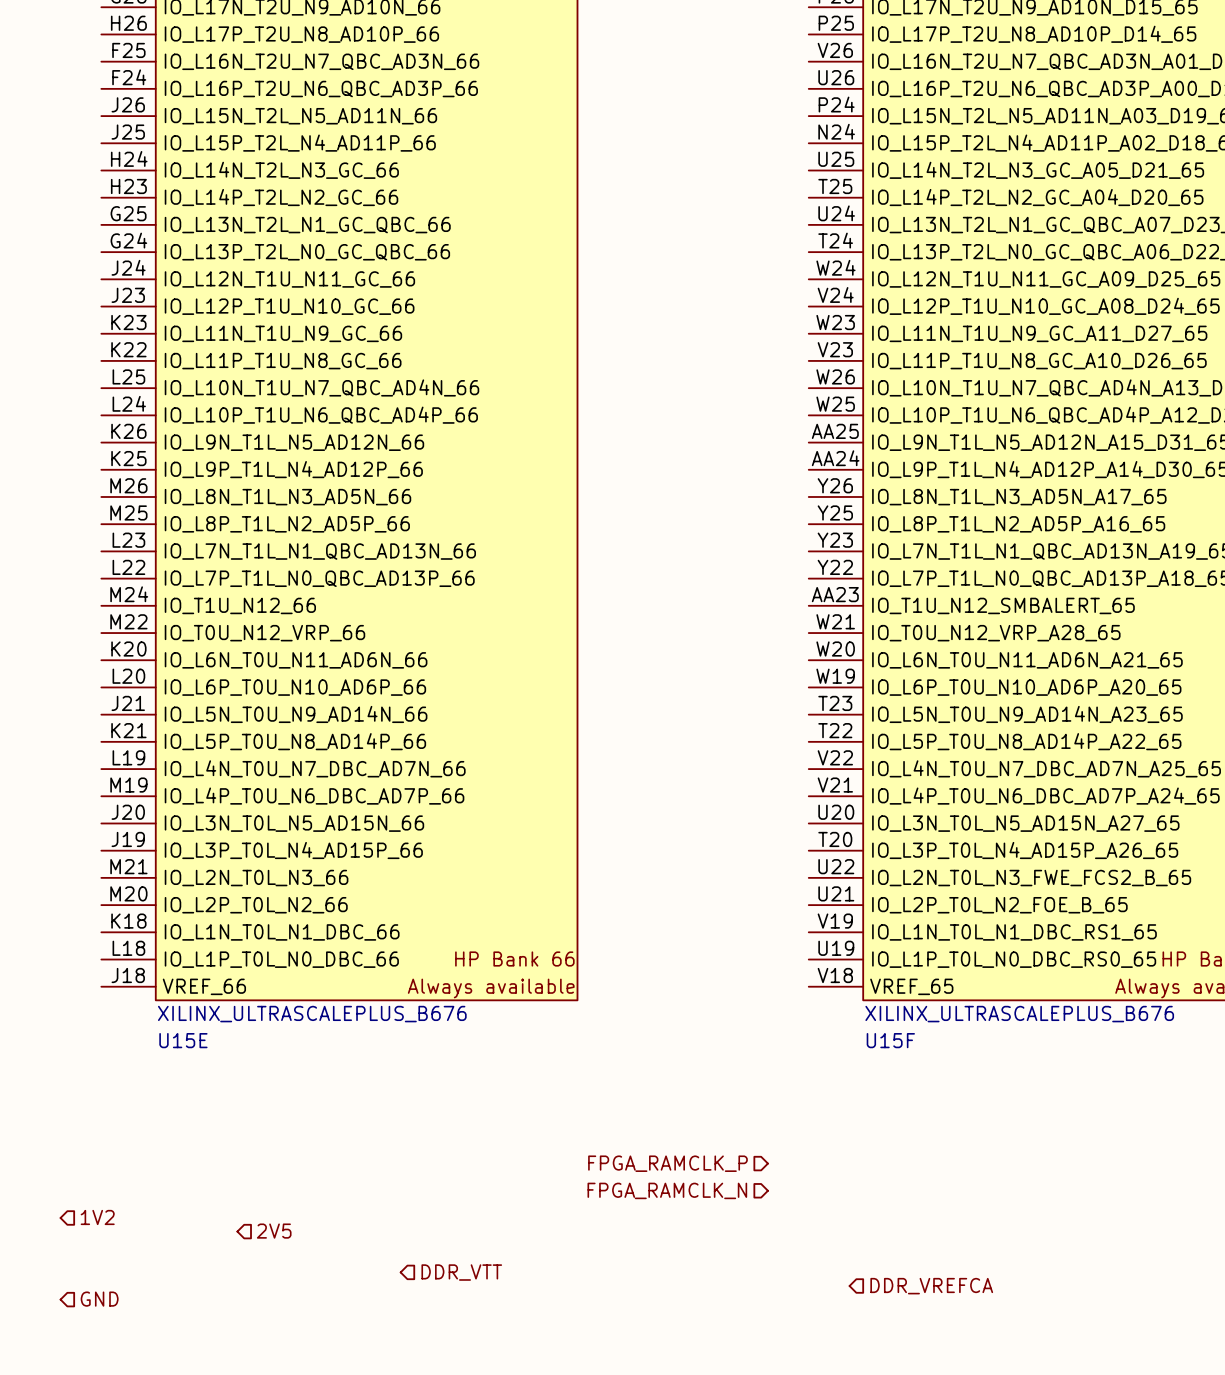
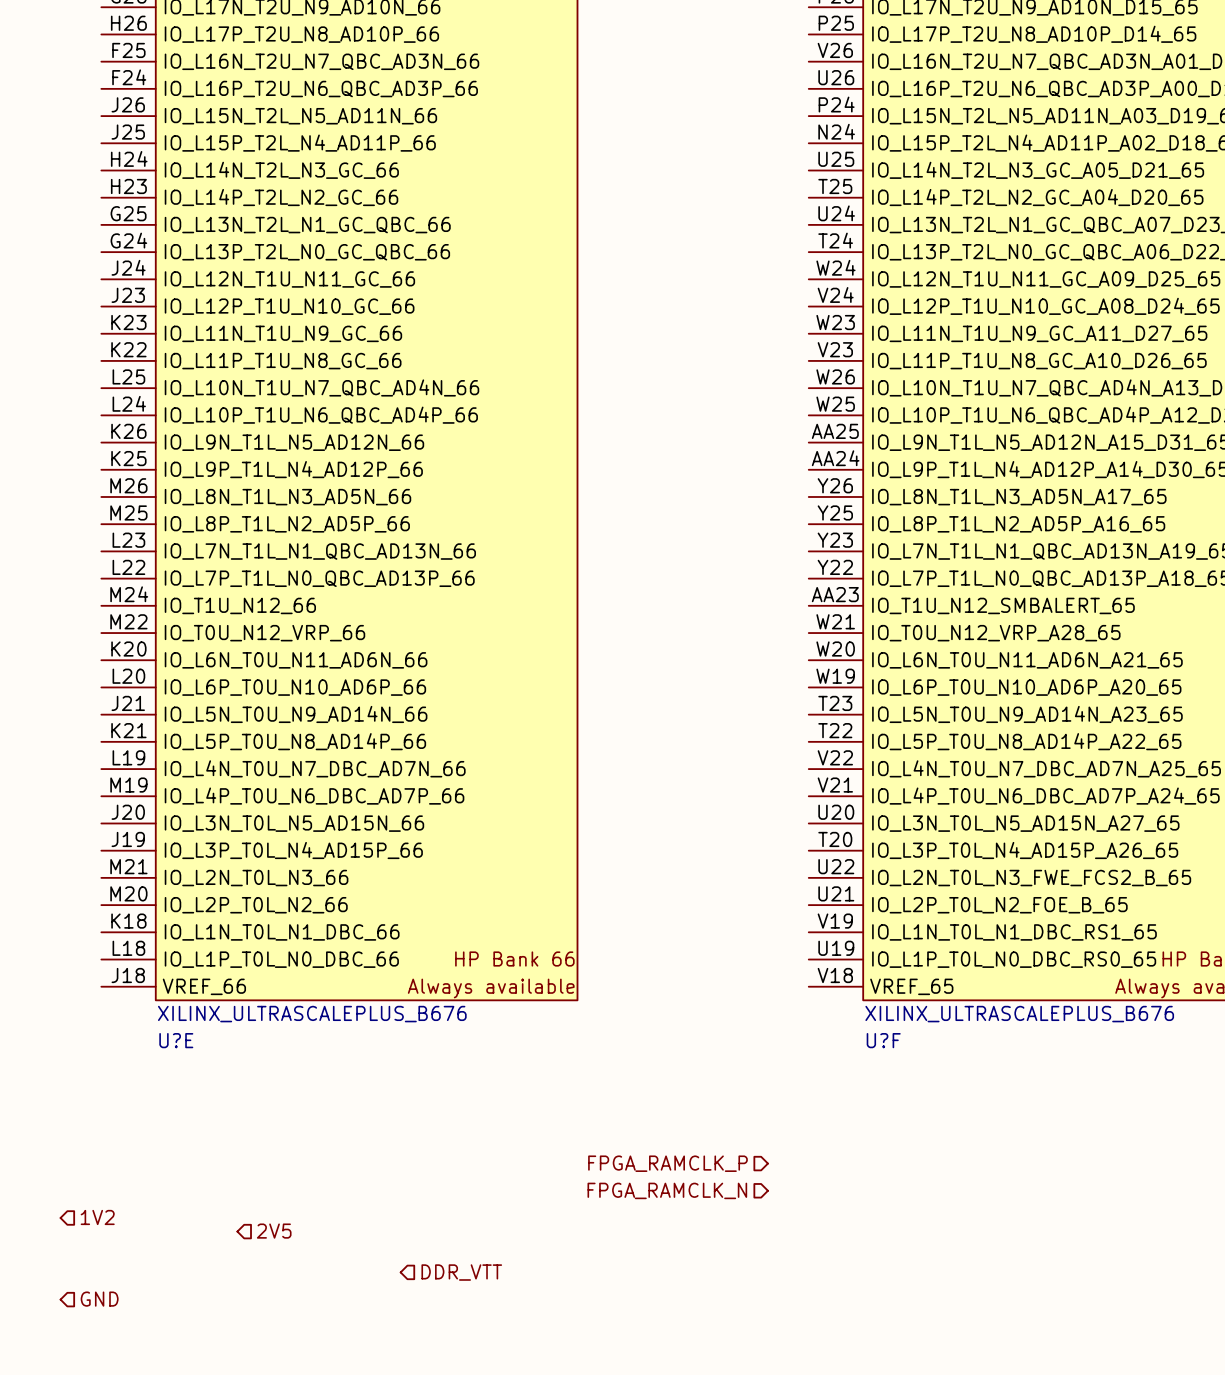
U15E name: U15E (183, 1040) -> U?E (176, 1040)
U15F name: U15F (890, 1040) -> U?F (883, 1040)
hierarchical label: DDR_VREFCA (931, 1286) -> none

